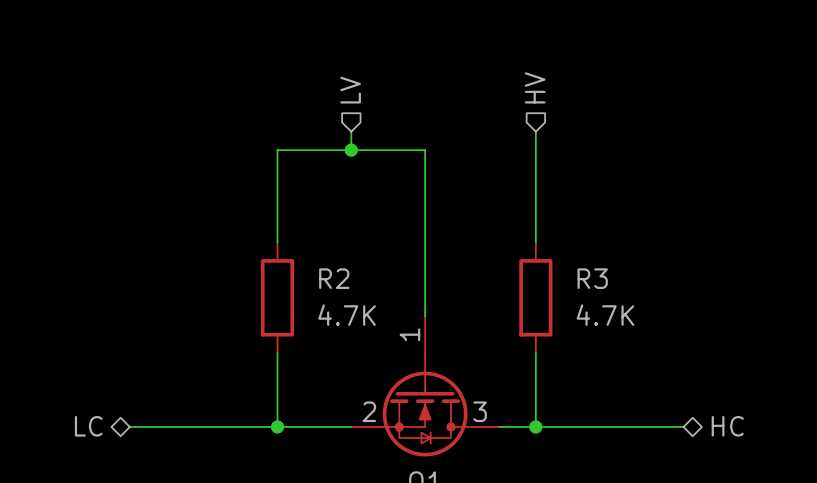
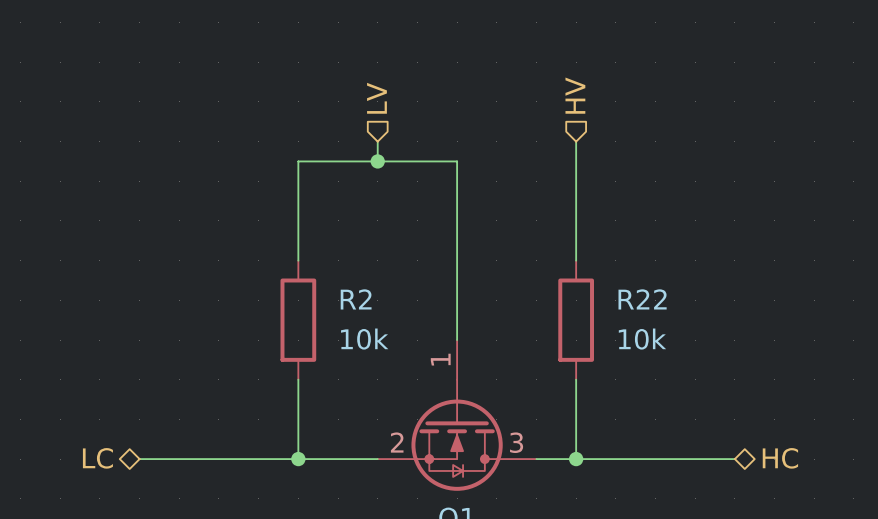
R3 name: R3 (592, 278) -> R22 (642, 299)
R2 value: 4.7K (347, 315) -> 10k (364, 339)
R3 value: 4.7K (605, 315) -> 10k (642, 339)

